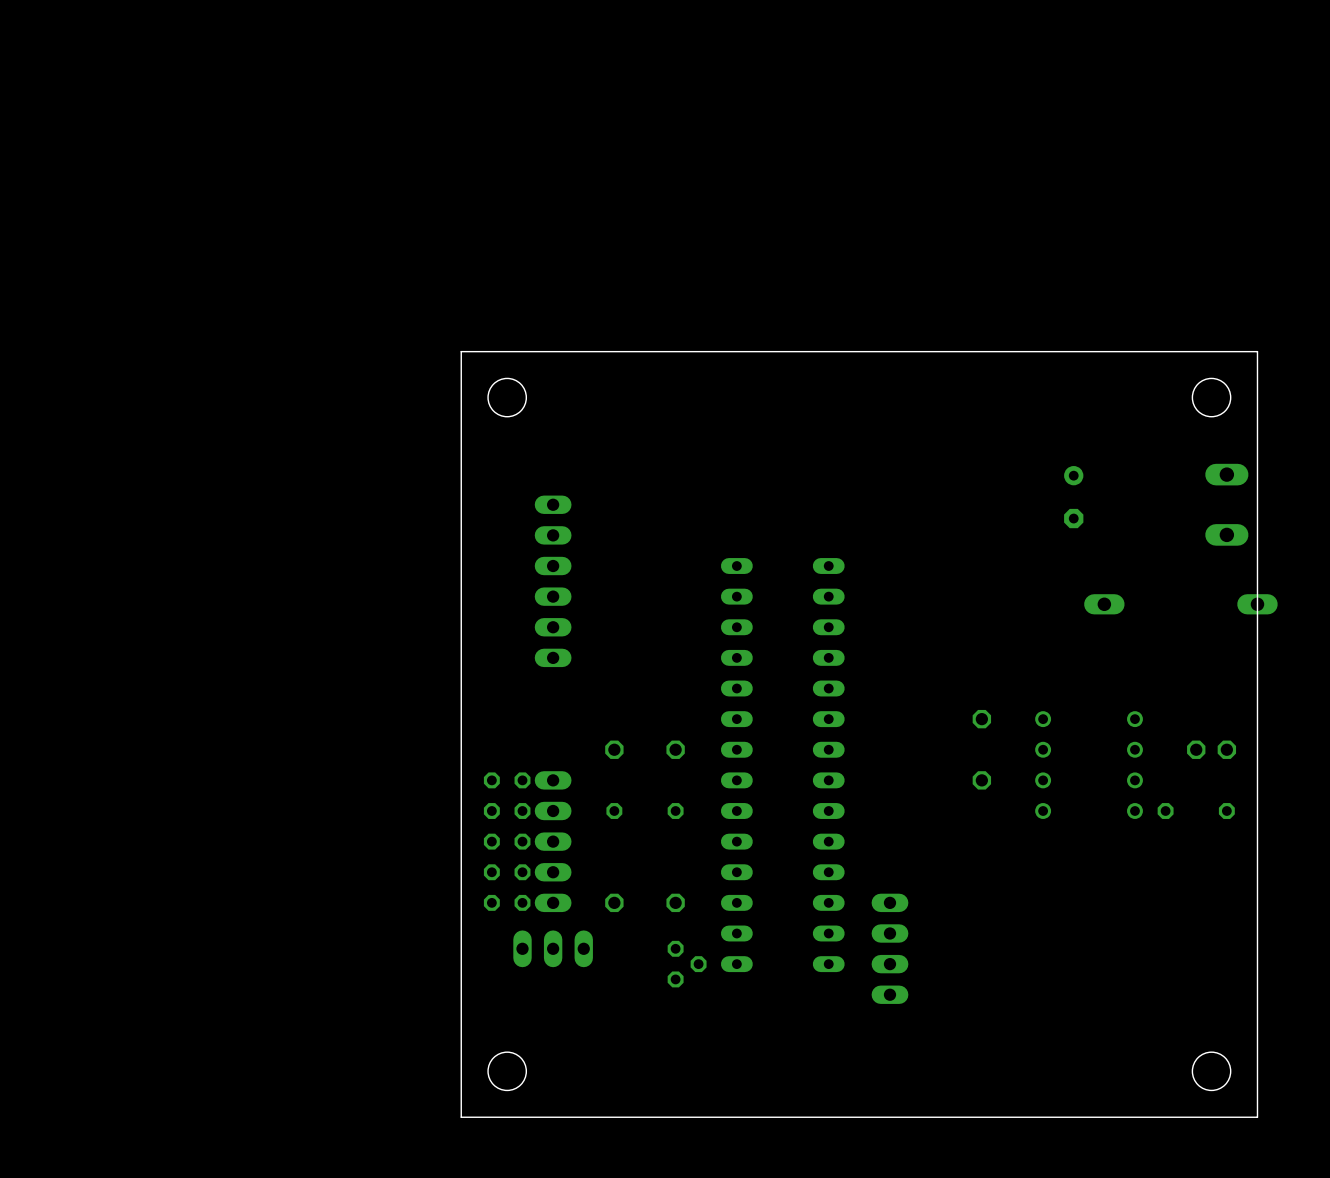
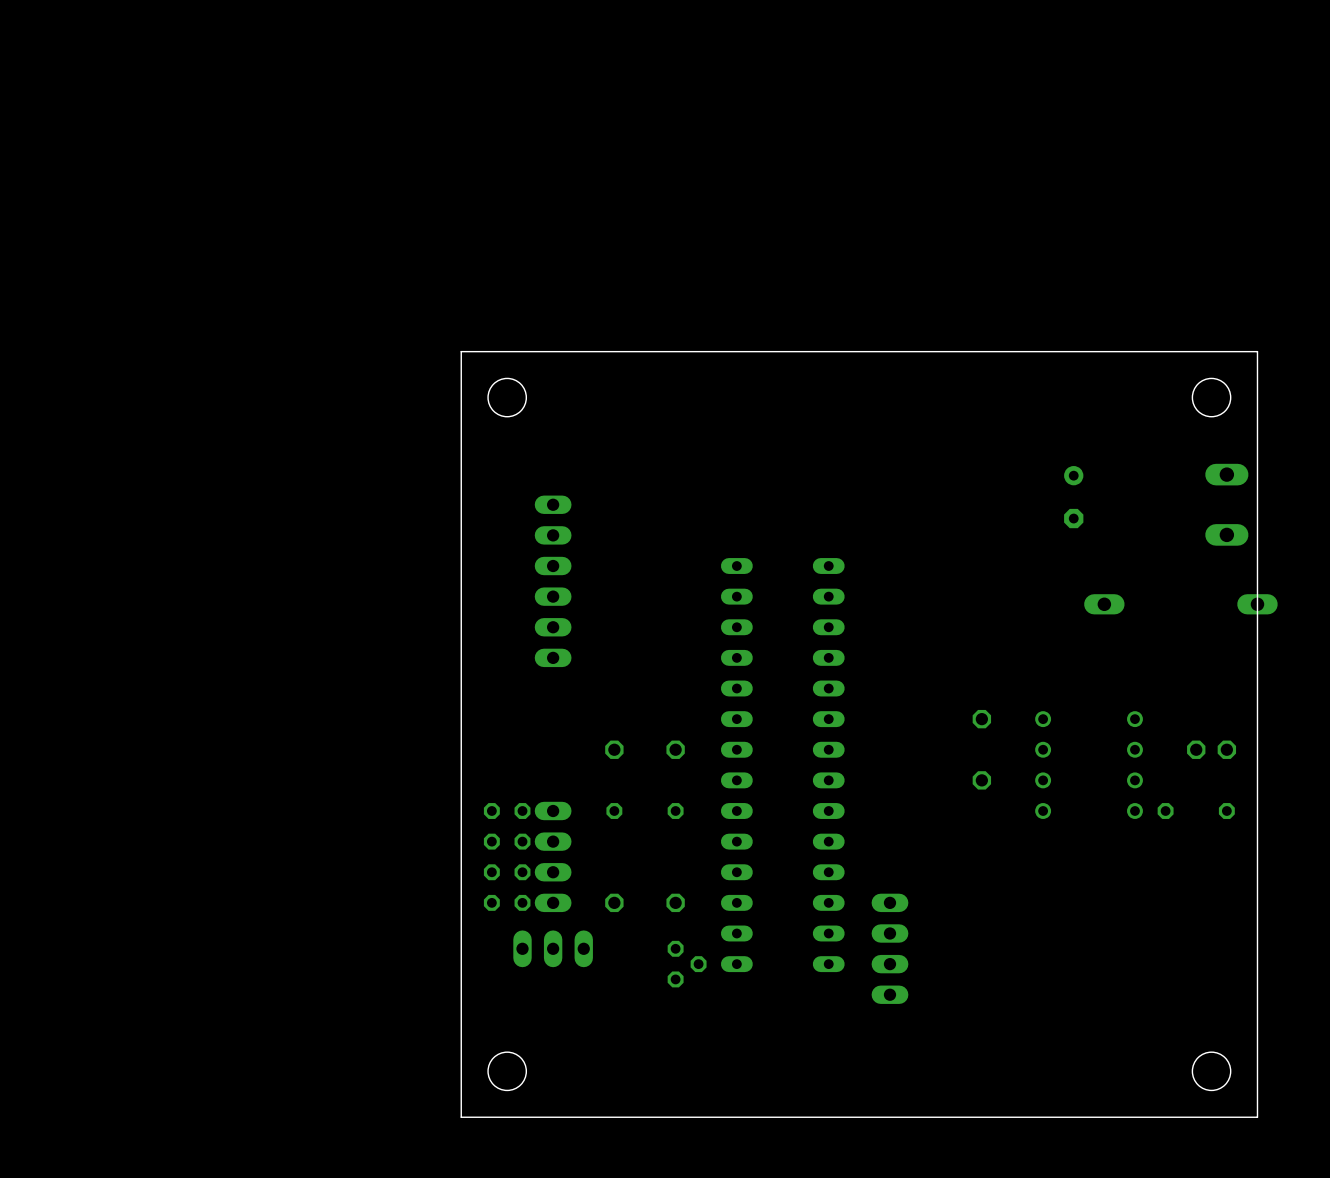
part: (507, 780) -> none
part: (553, 841) -> none

